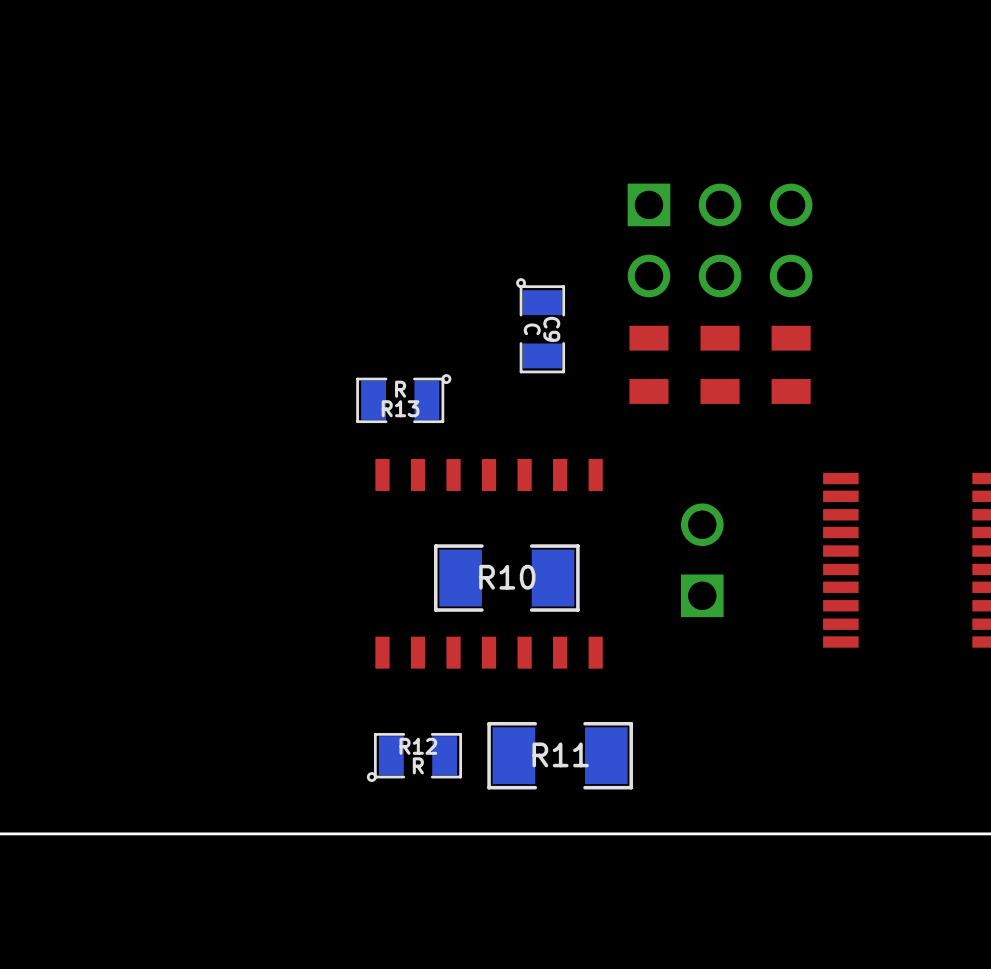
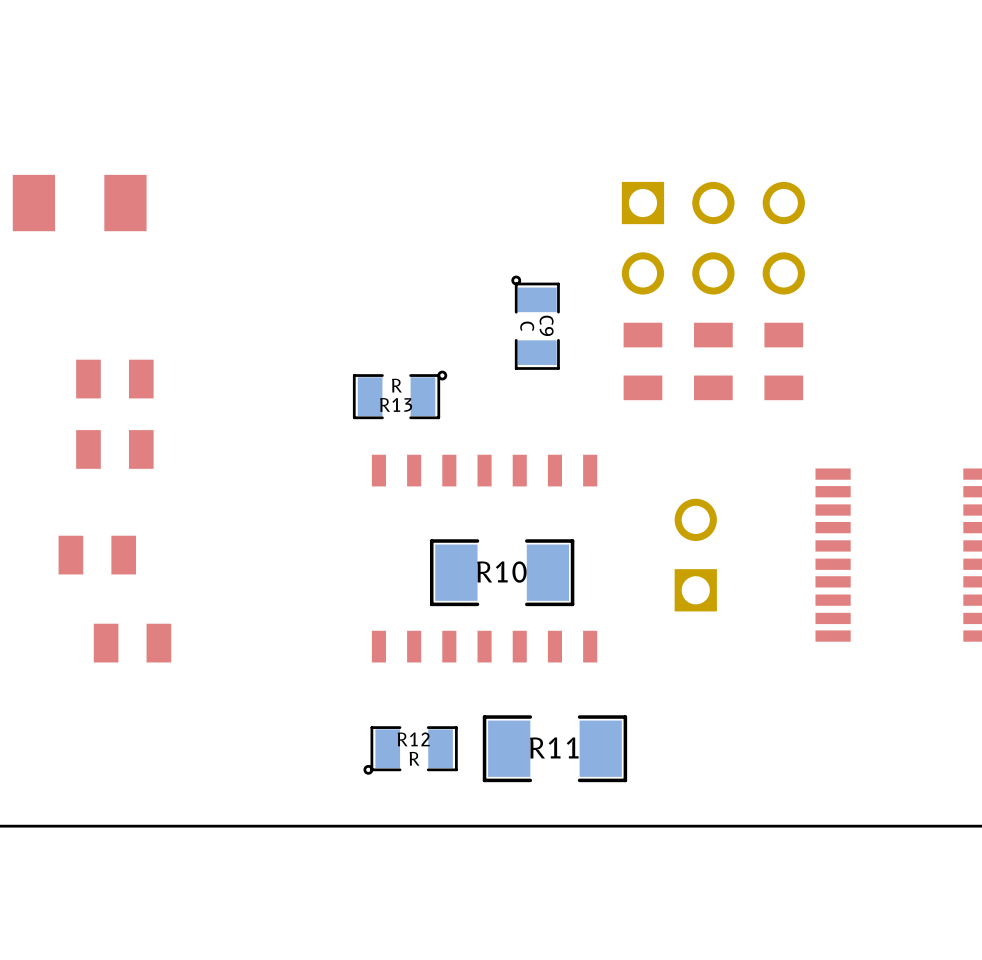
part: none -> (79, 203)
part: none -> (114, 379)
part: none -> (114, 449)
part: none -> (97, 555)
part: none -> (132, 643)

